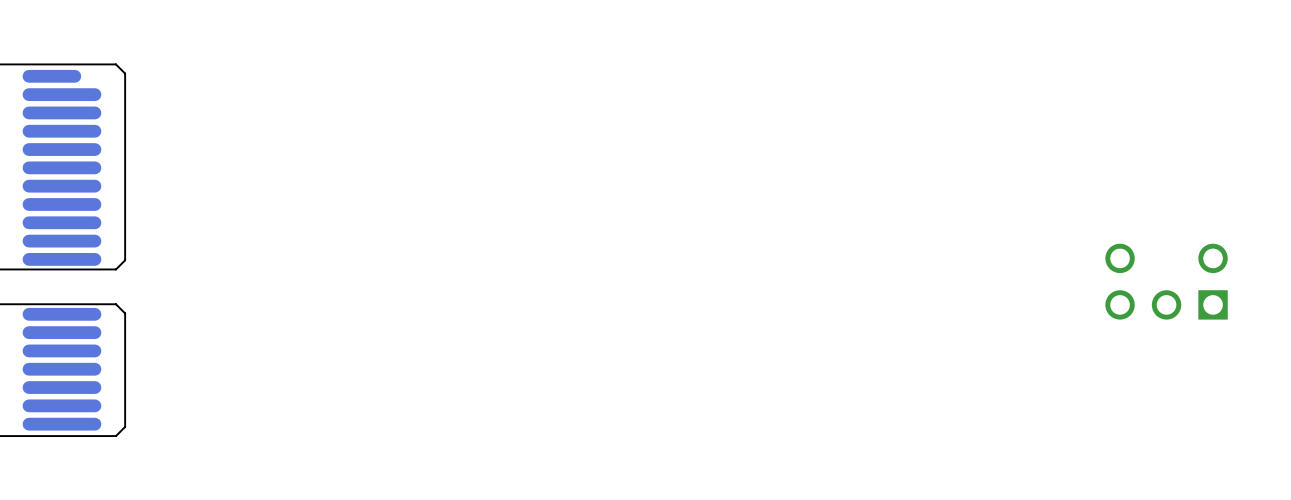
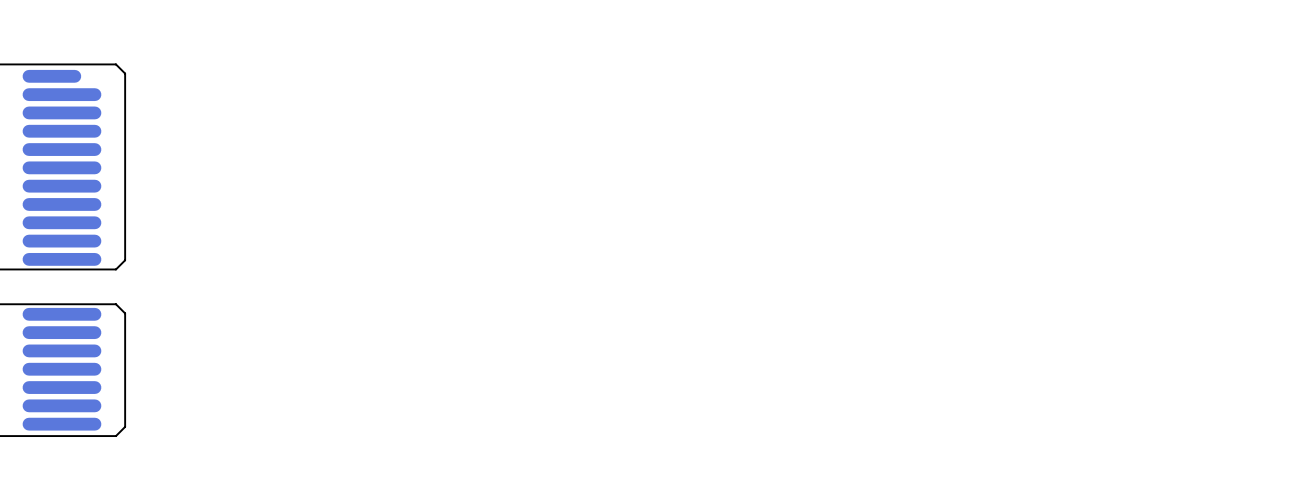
part: (1166, 281) -> none

